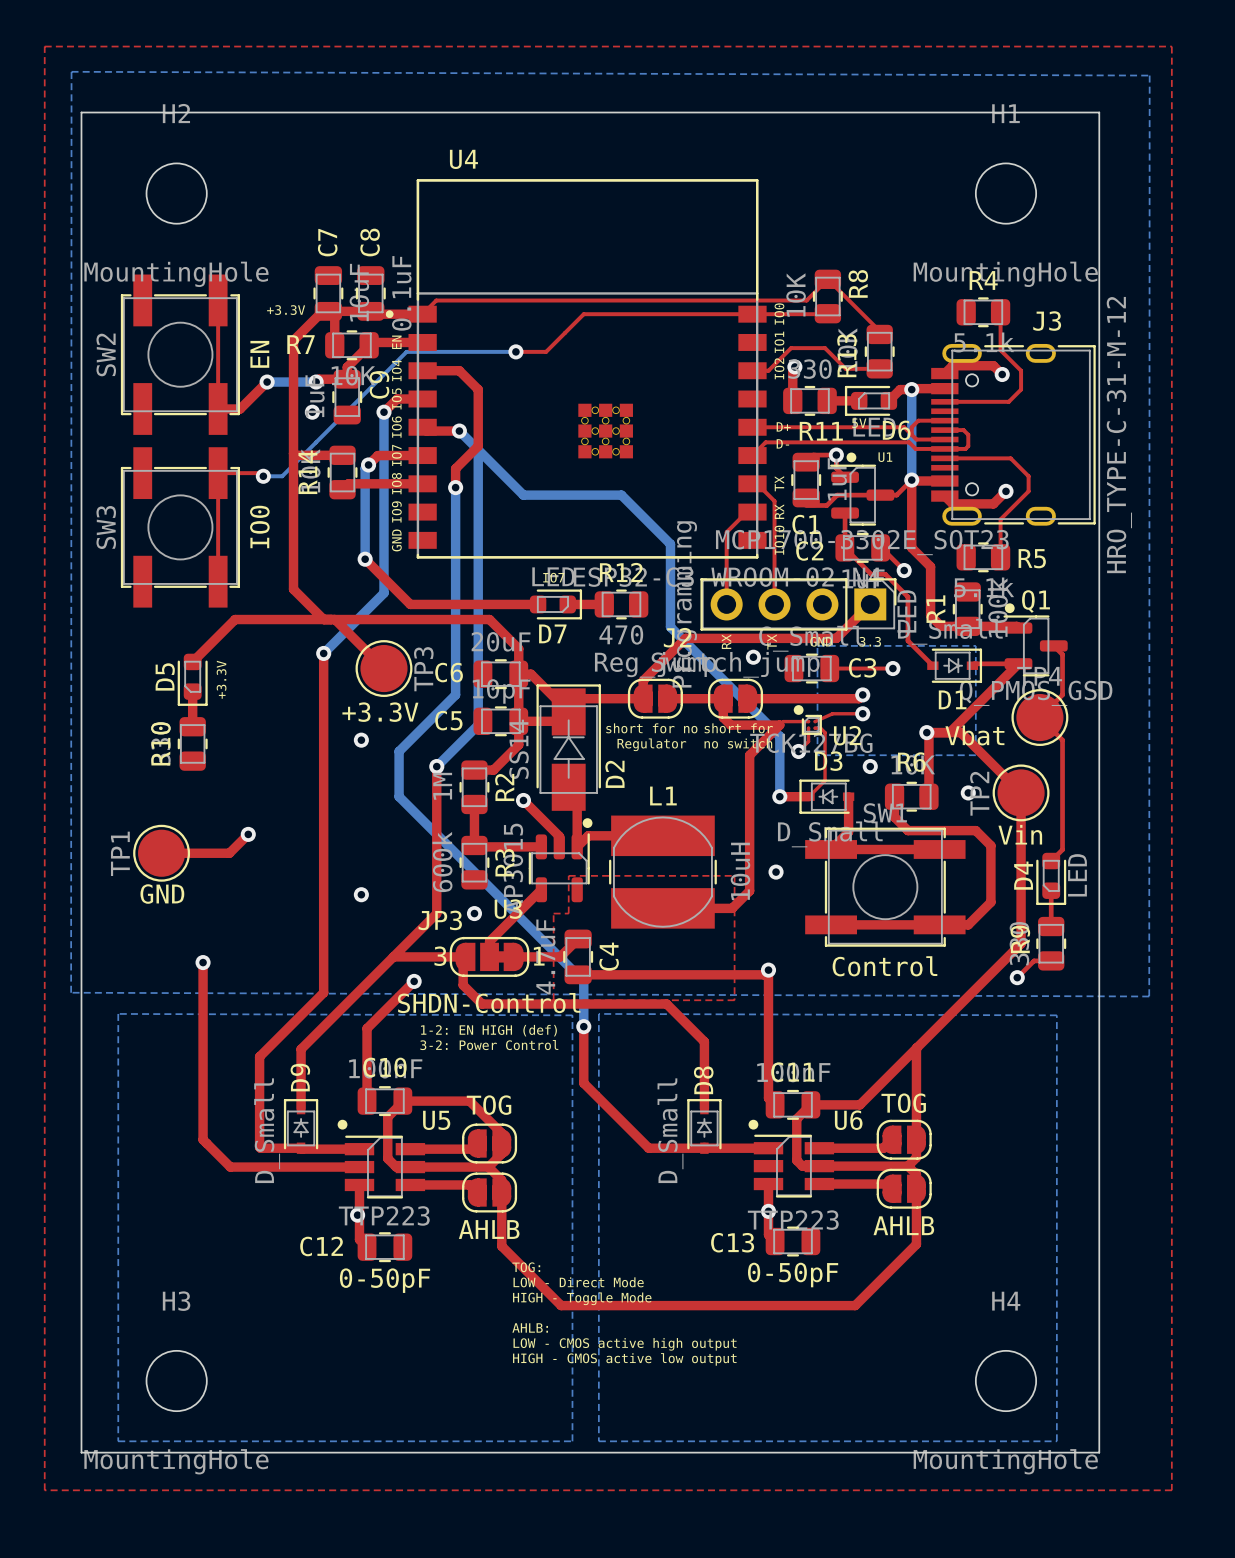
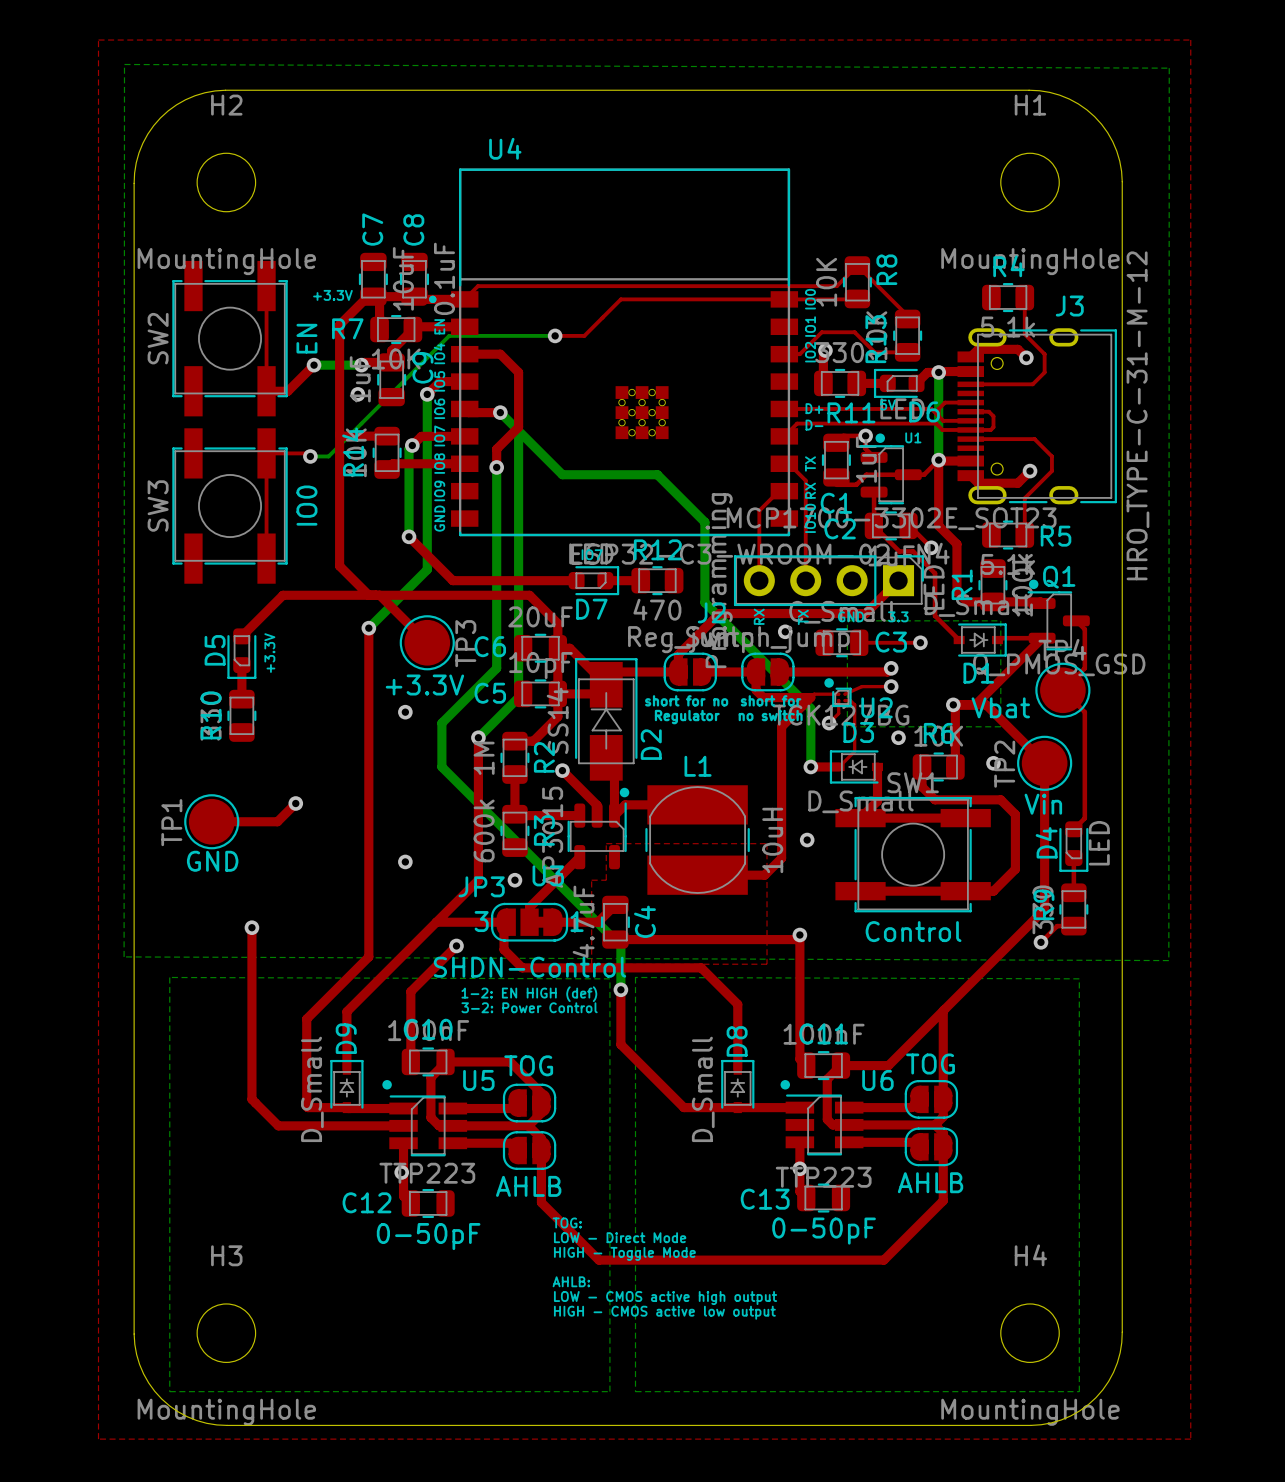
board edge: (81, 194) (81, 112) (1099, 112) (1099, 1452) (81, 1452) (81, 1381) -> (134, 183) (136, 162) (142, 143) (160, 117) (176, 104) (195, 95) (225, 90) (1039, 90) (1059, 95) (1078, 103) (1101, 124) (1116, 151) (1122, 181) (1122, 1332) (1117, 1362) (1102, 1389) (1088, 1404) (1070, 1415) (1051, 1422) (1030, 1425) (216, 1424) (187, 1416) (161, 1399) (143, 1374) (136, 1354) (134, 1334)

